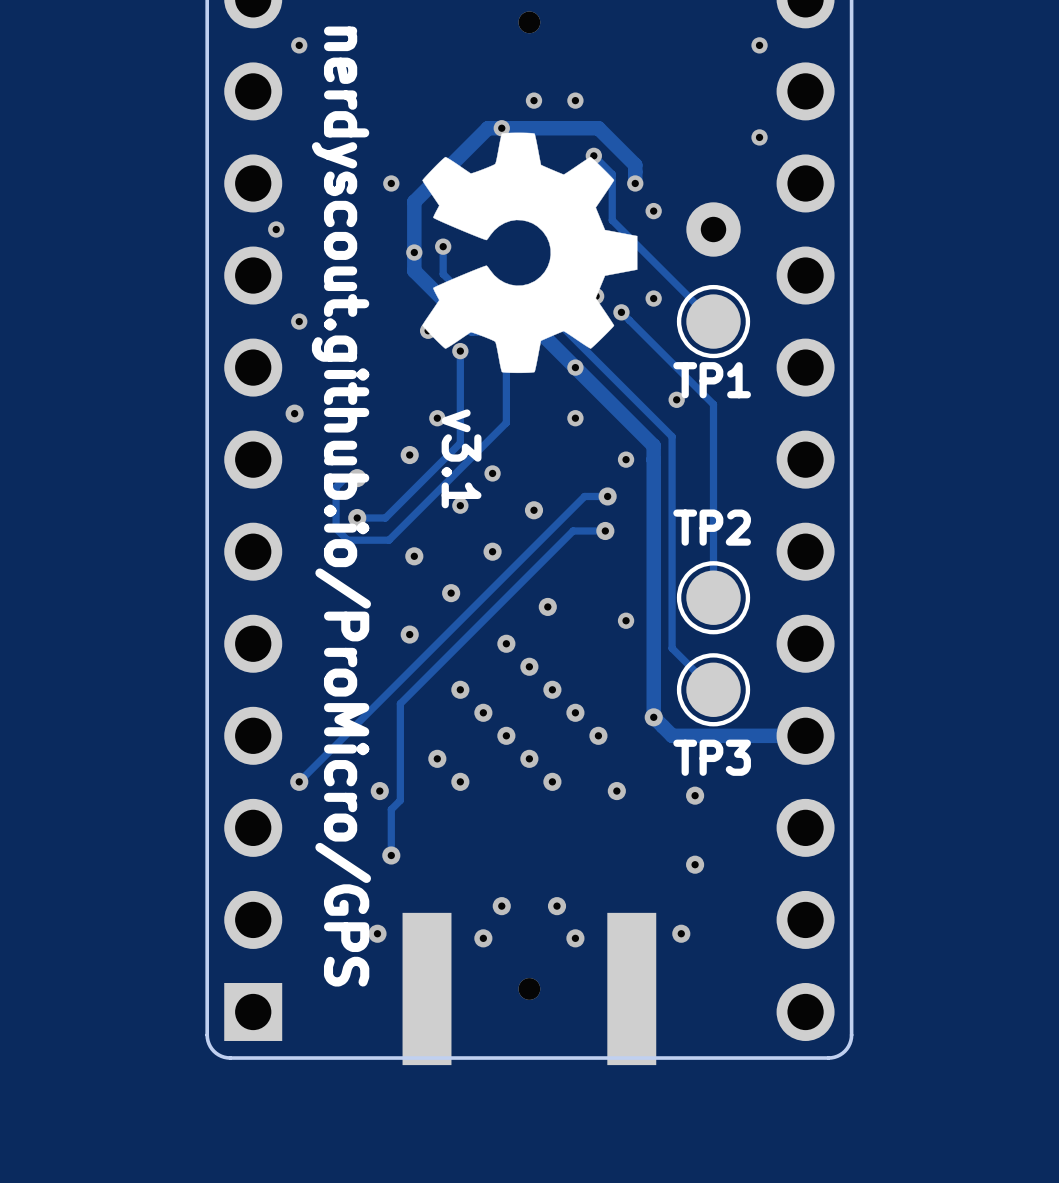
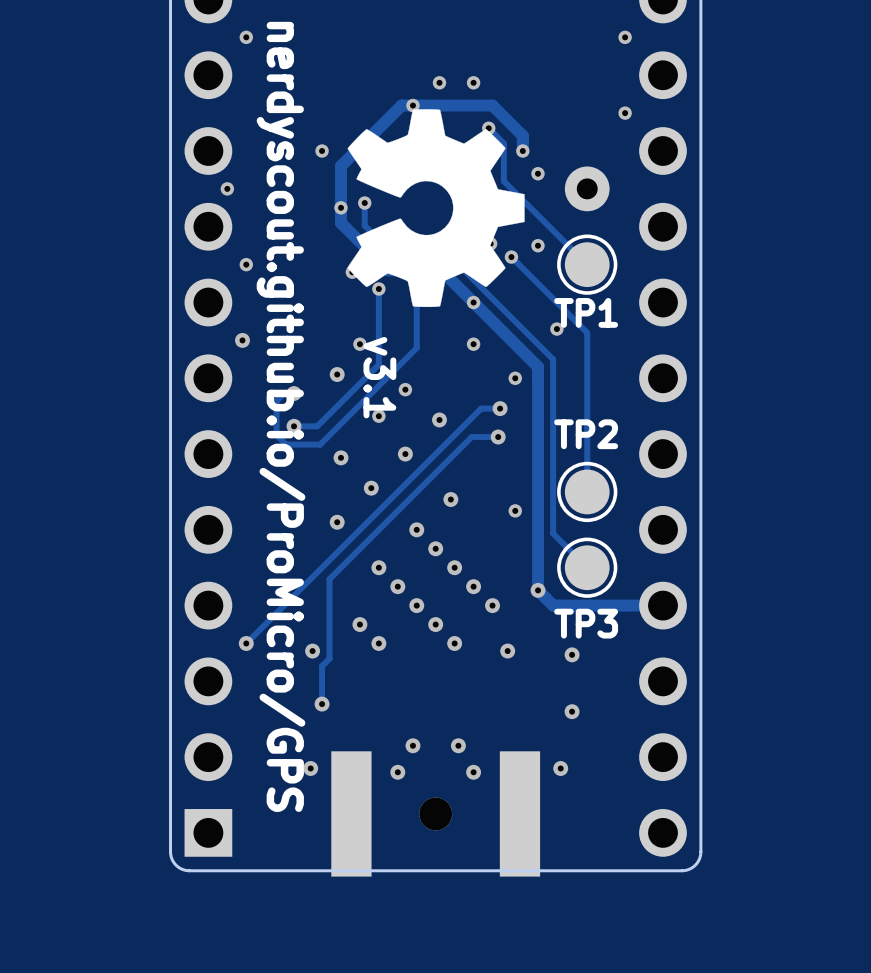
part: (529, 22) -> none
part footprint: [518, 978, 541, 1000] -> [419, 797, 453, 831]

